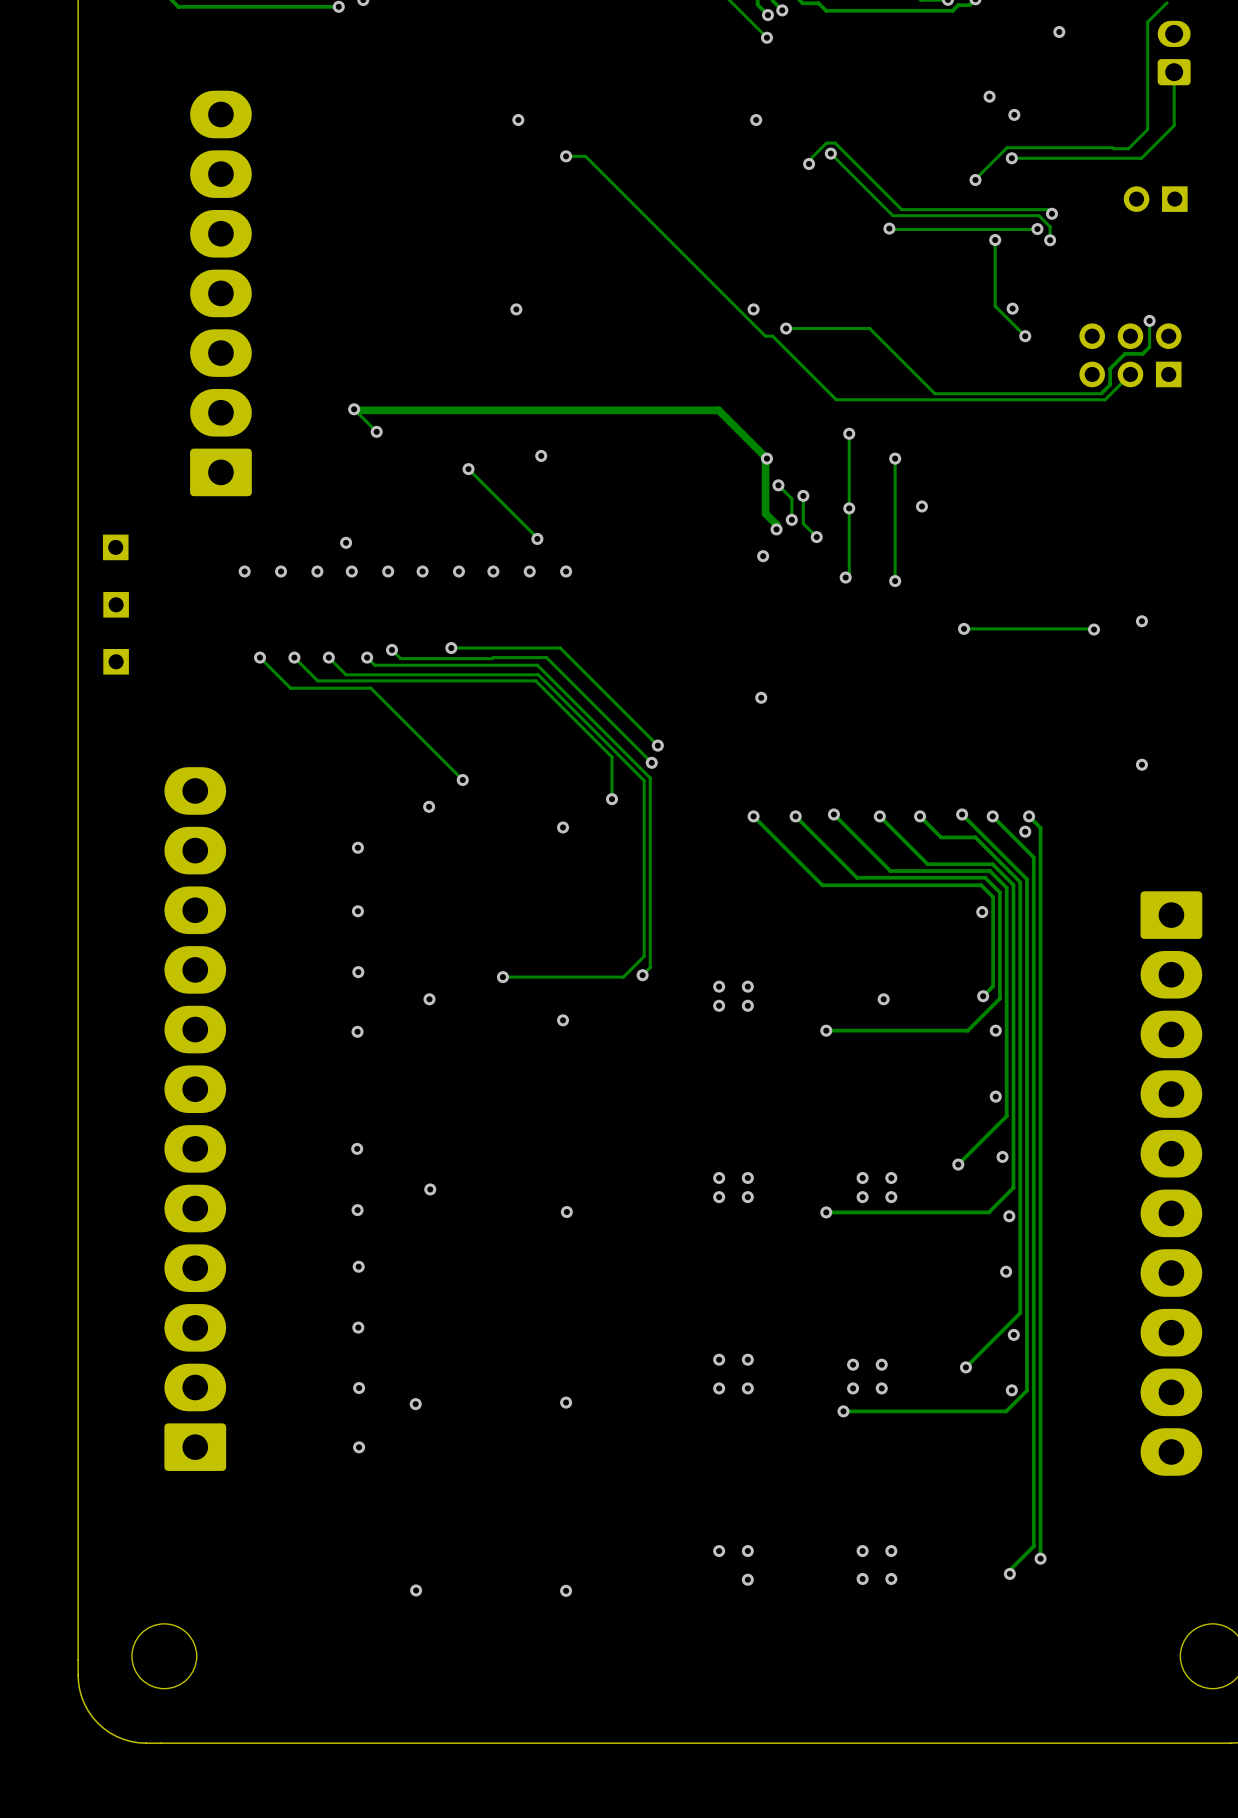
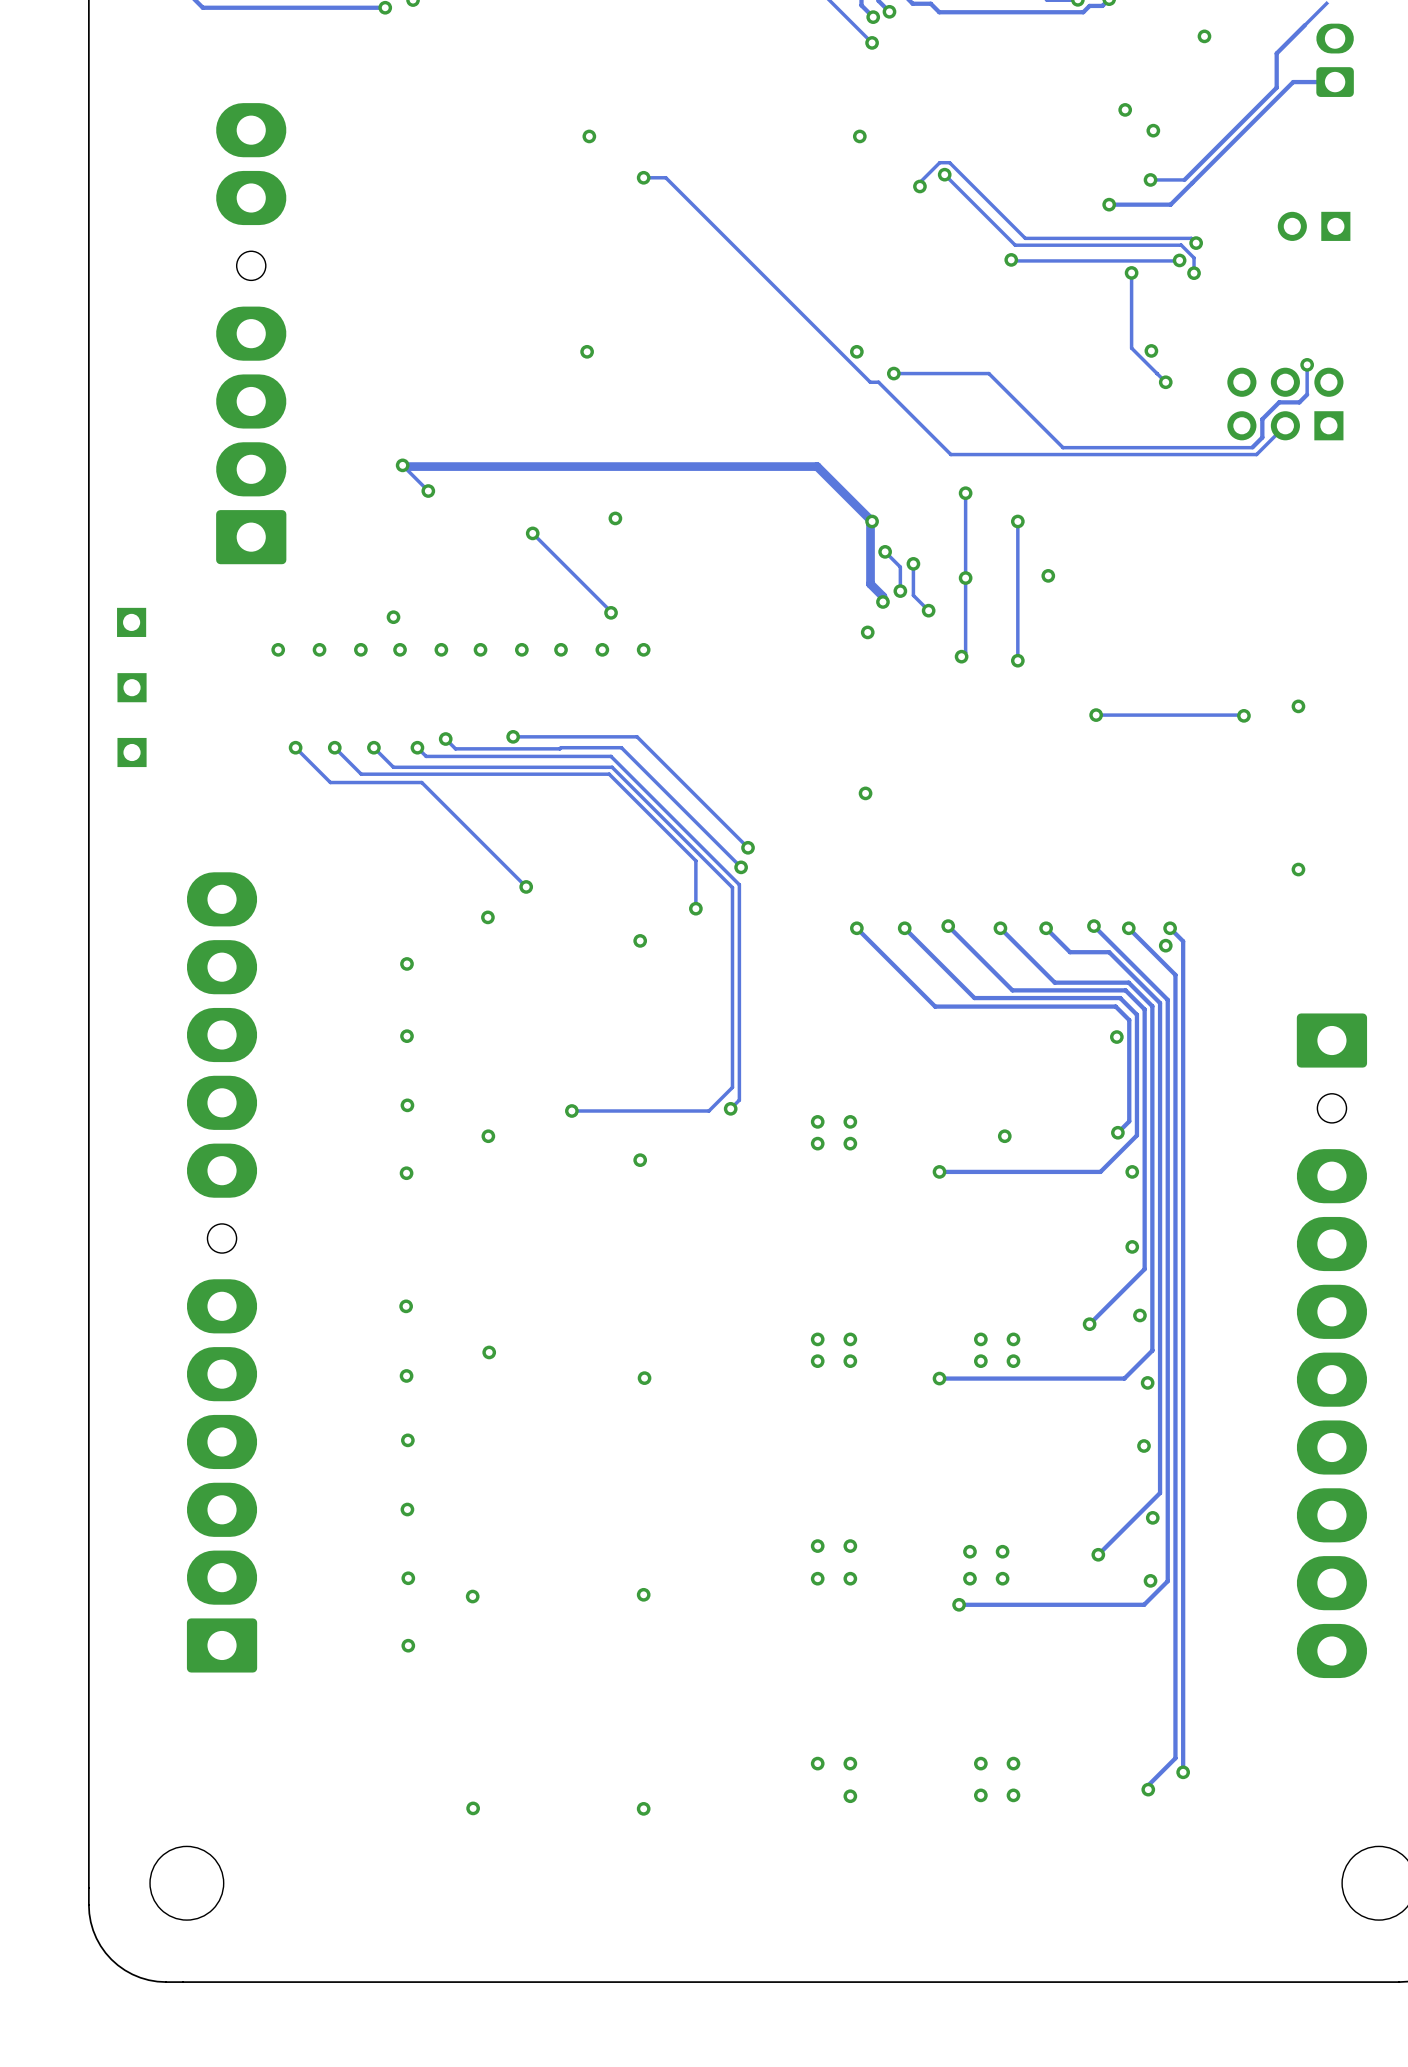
track: (1147, 22) (1147, 129) (1128, 148) (1007, 147) (975, 180) -> (1335, 82) (1293, 82) (1170, 204) (1109, 204)
track: (1174, 72) (1174, 125) (1141, 158) (1041, 158) -> (1304, 25) (1276, 53) (1276, 87) (1184, 179)
part footprint: [190, 90, 252, 497] -> [216, 103, 287, 565]
part footprint: [164, 767, 227, 1471] -> [186, 872, 258, 1673]
part footprint: [1140, 891, 1203, 1476] -> [1296, 1013, 1368, 1679]

